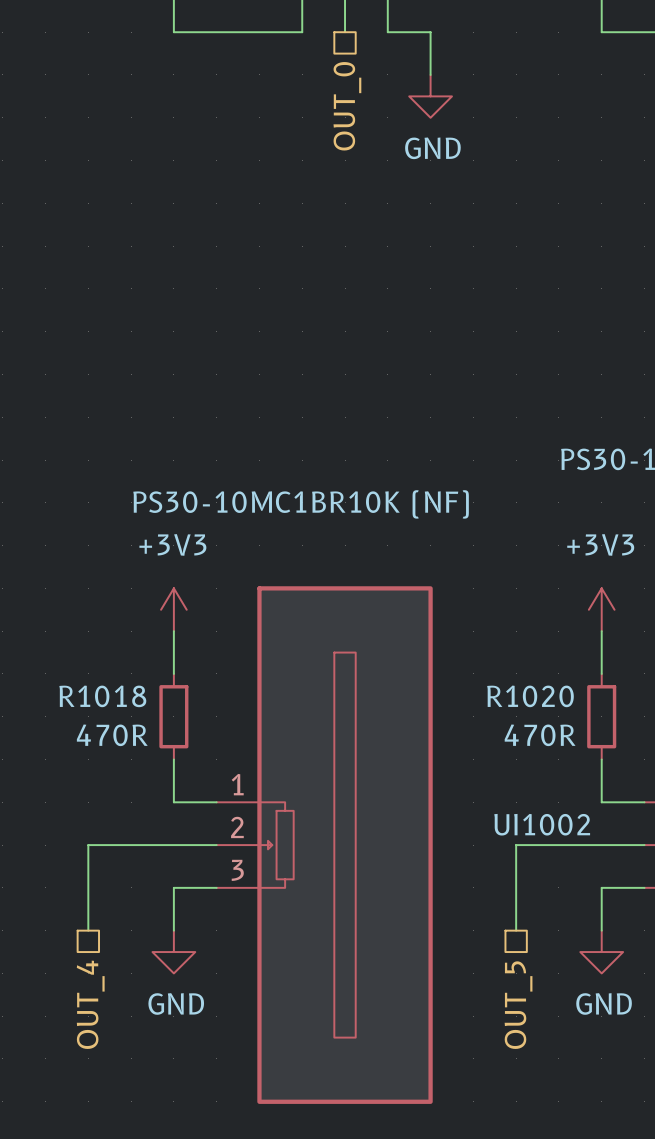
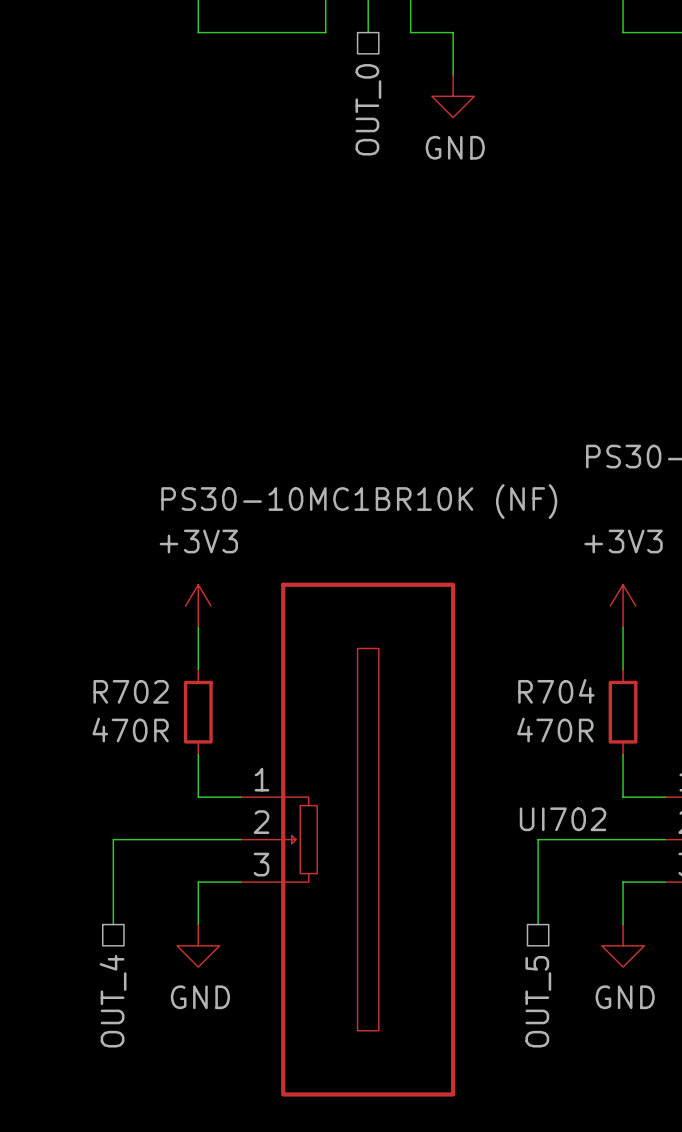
R1018 name: R1018 (102, 696) -> R702 (131, 691)
R1020 name: R1020 (530, 696) -> R704 (556, 691)
UI1002 name: UI1002 (542, 824) -> UI702 (563, 819)

